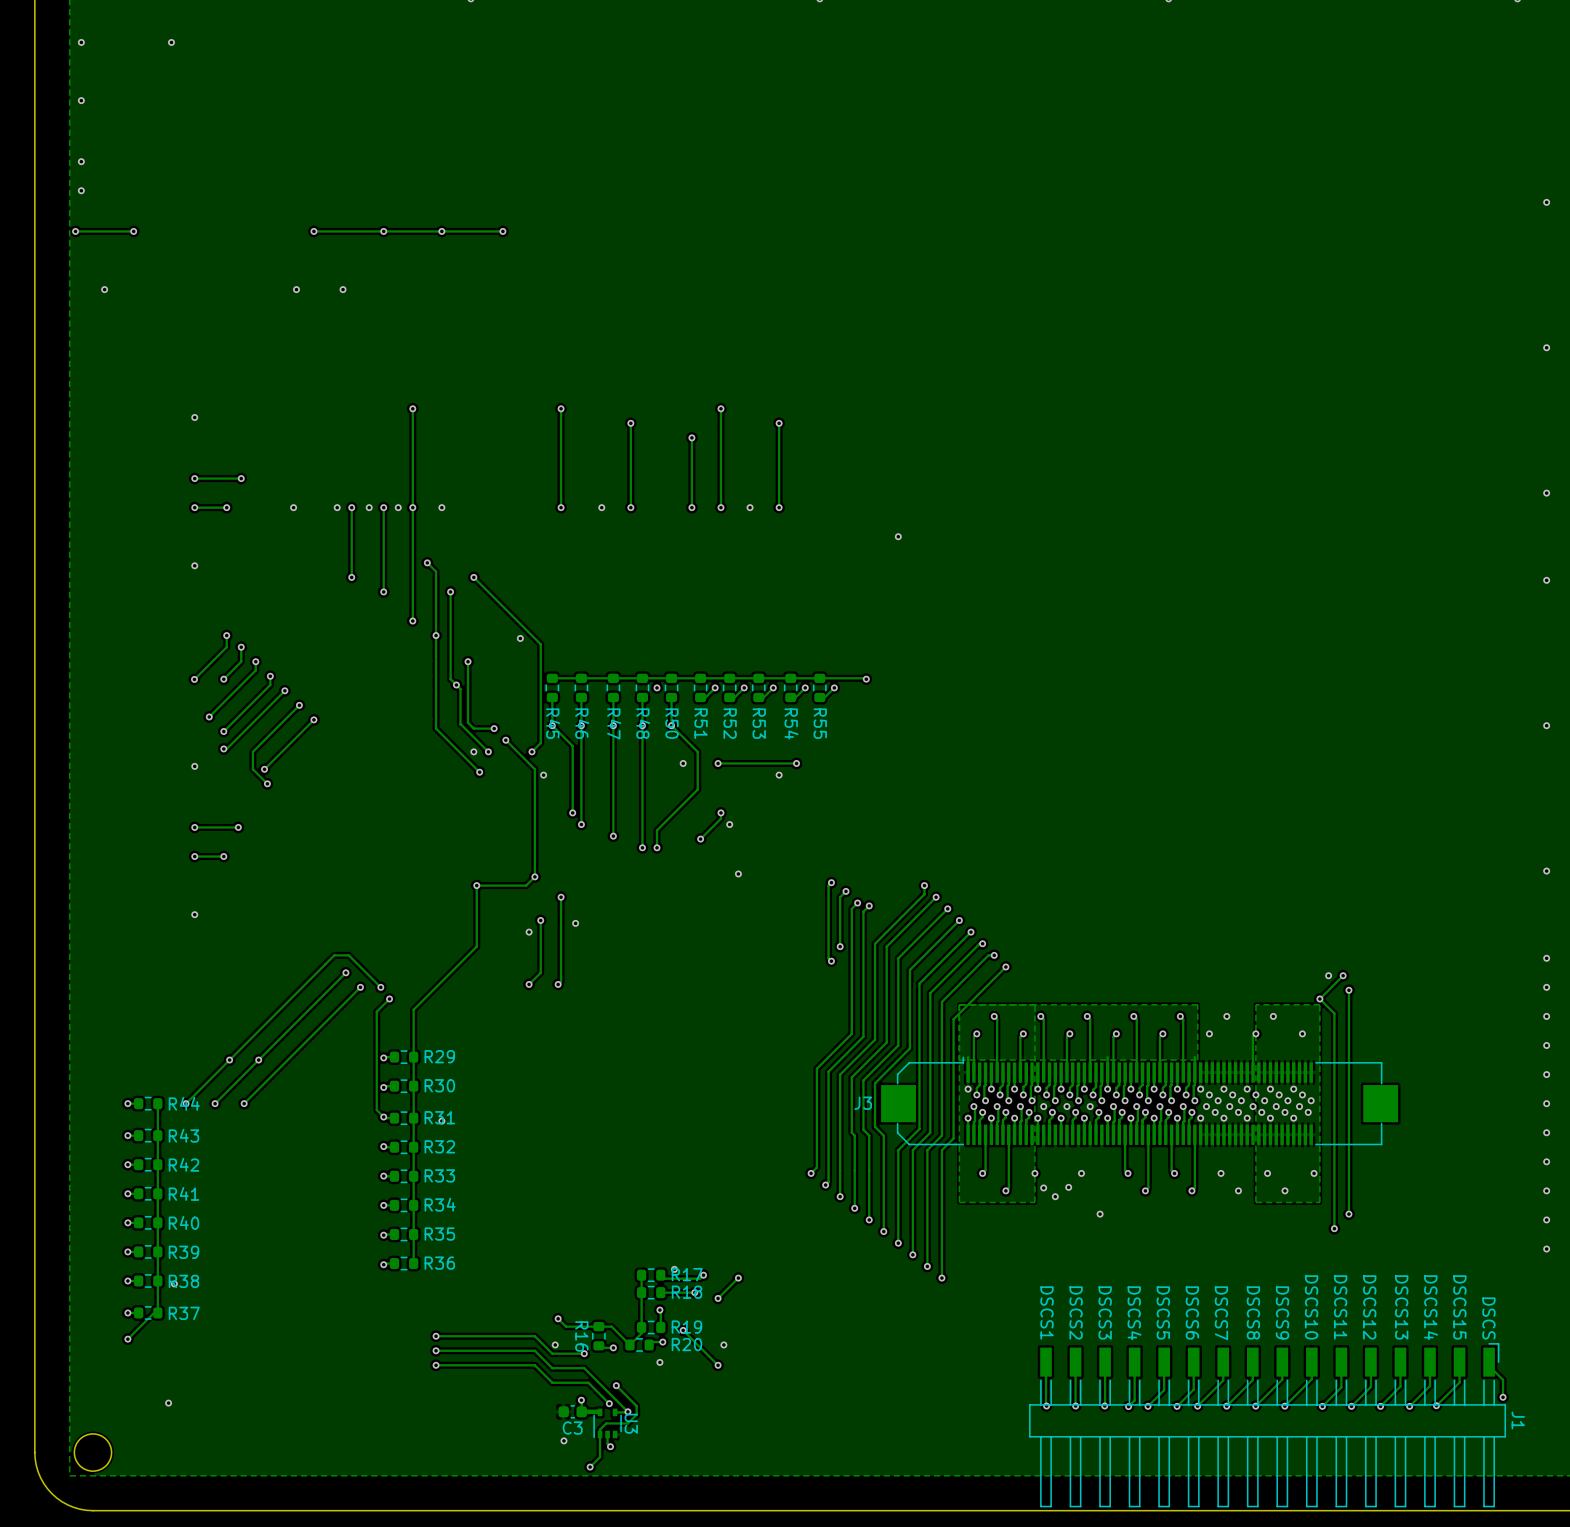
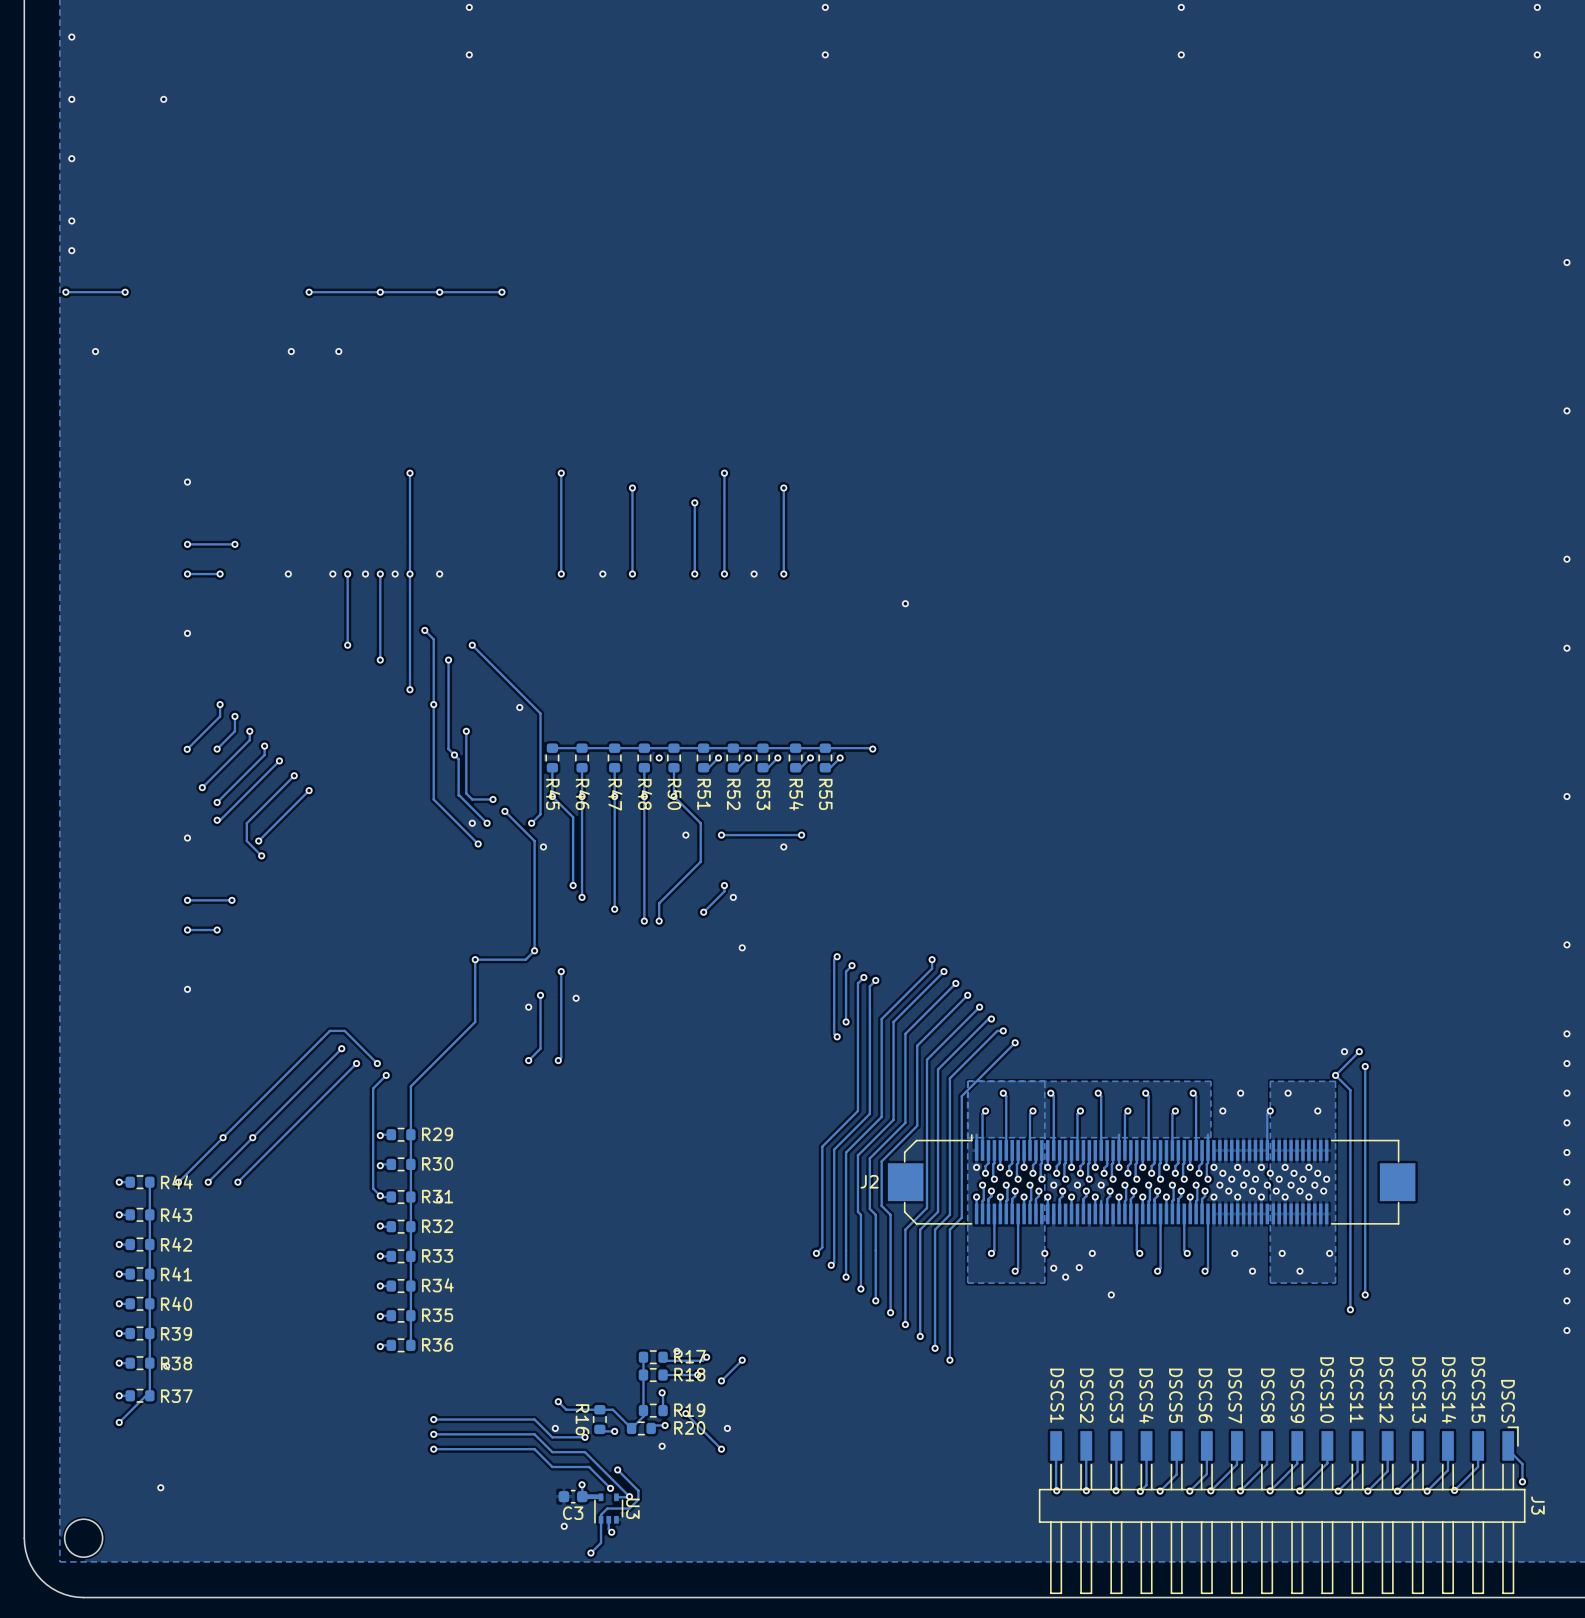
J3 name: J3 (863, 1103) -> J2 (869, 1181)
J1 name: J1 (1518, 1420) -> J3 (1537, 1505)

